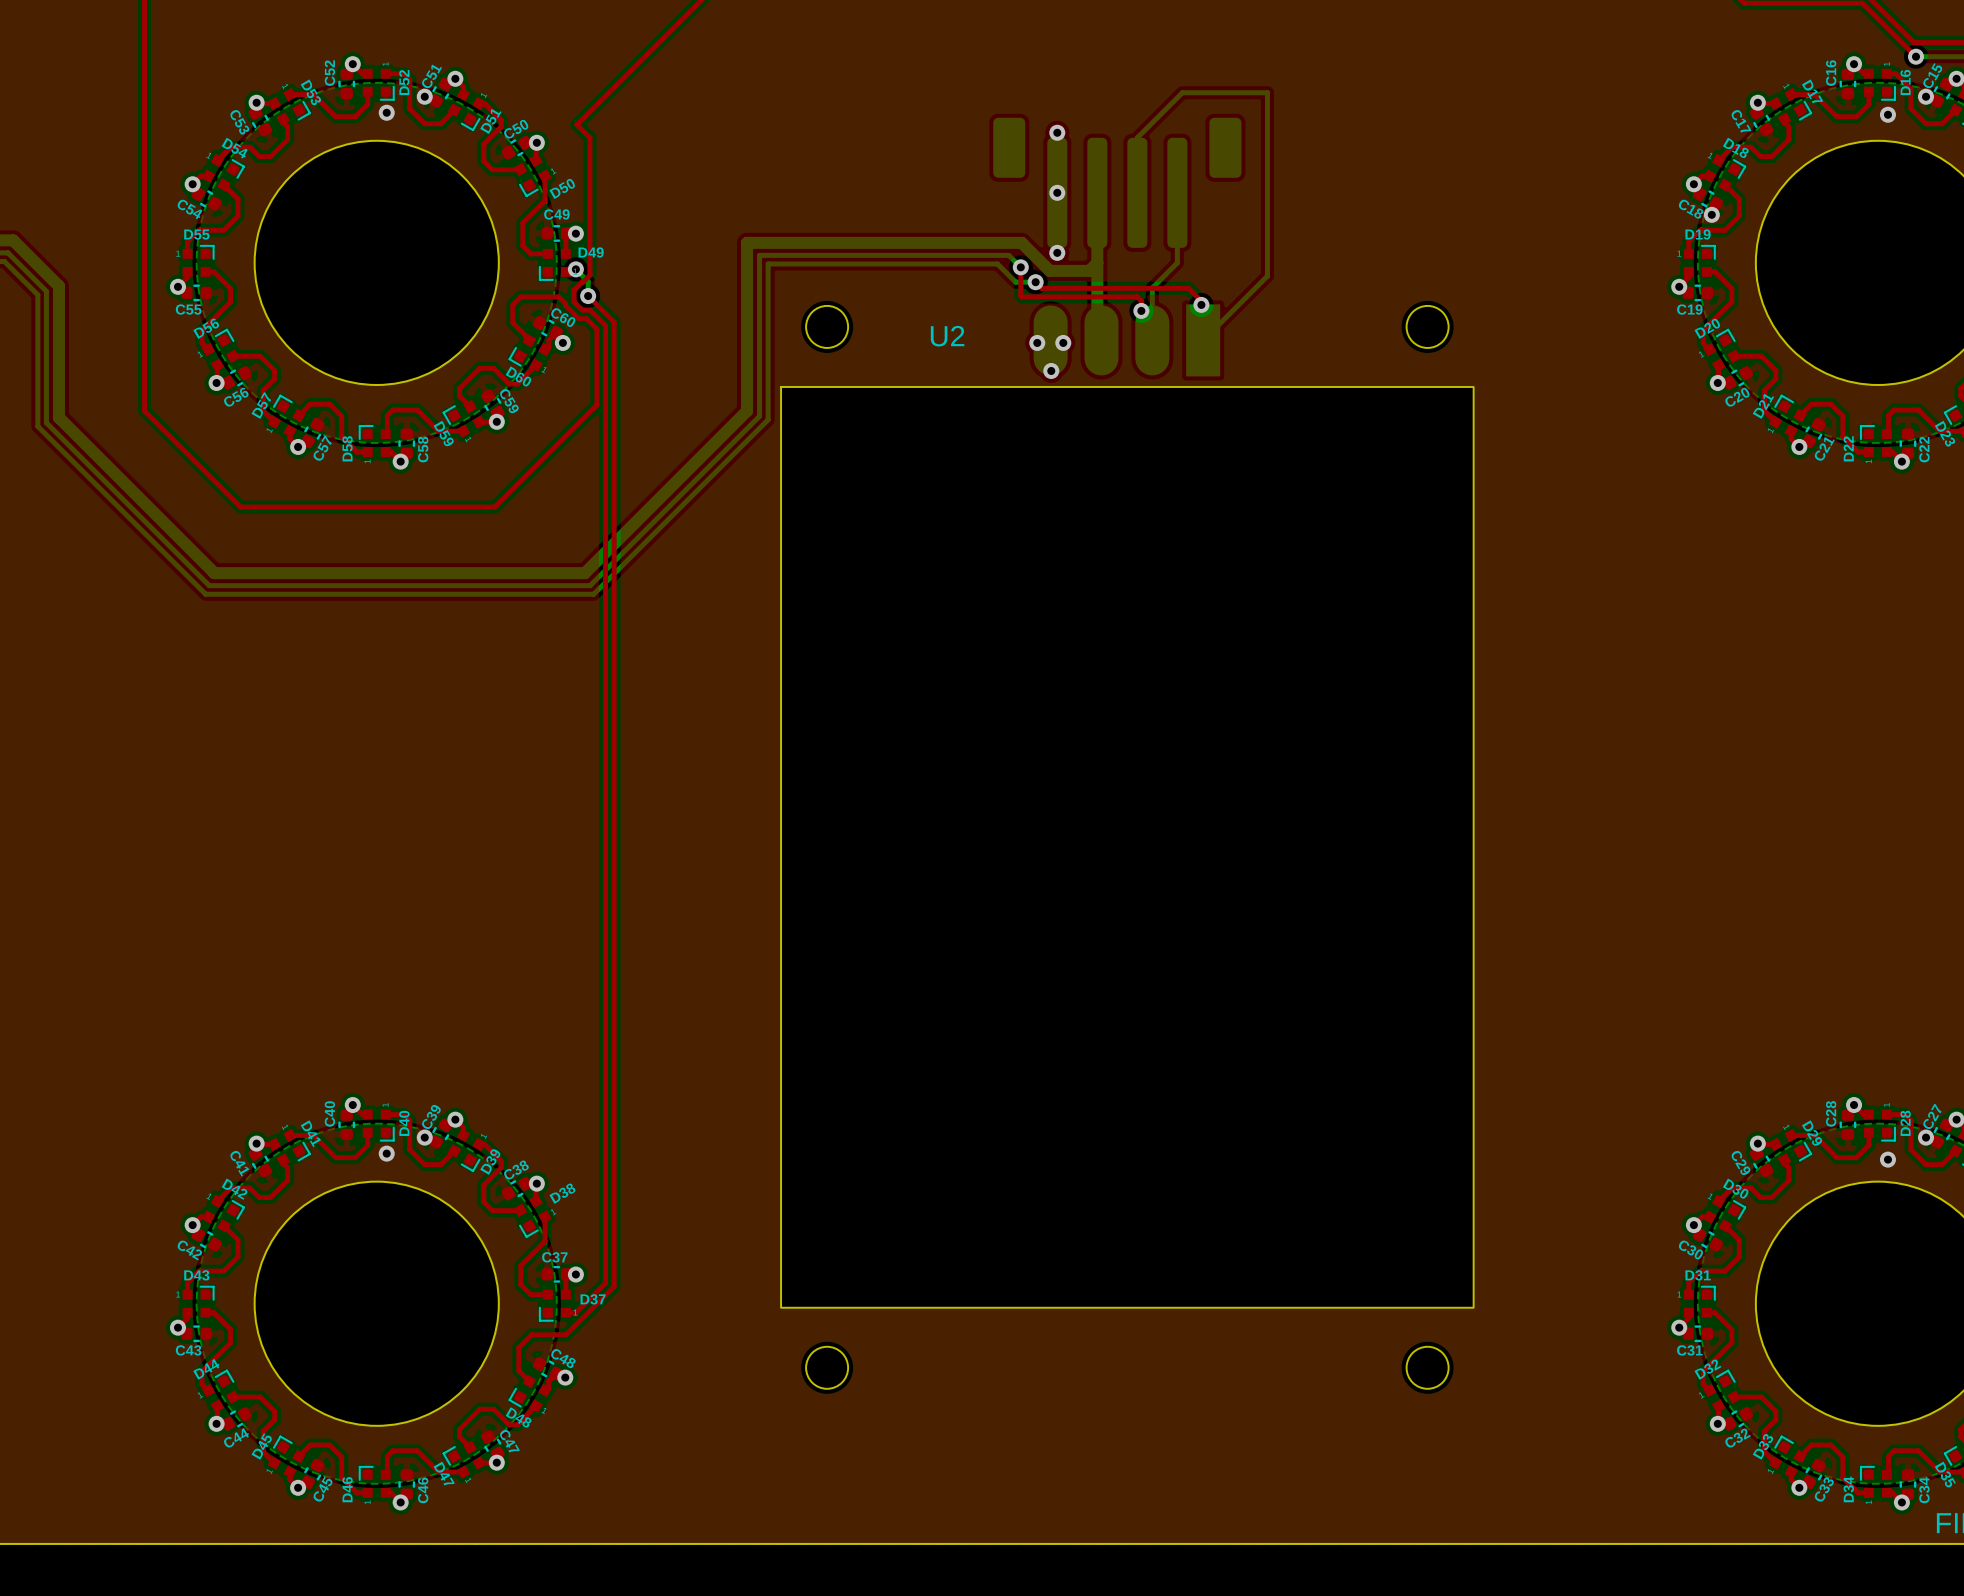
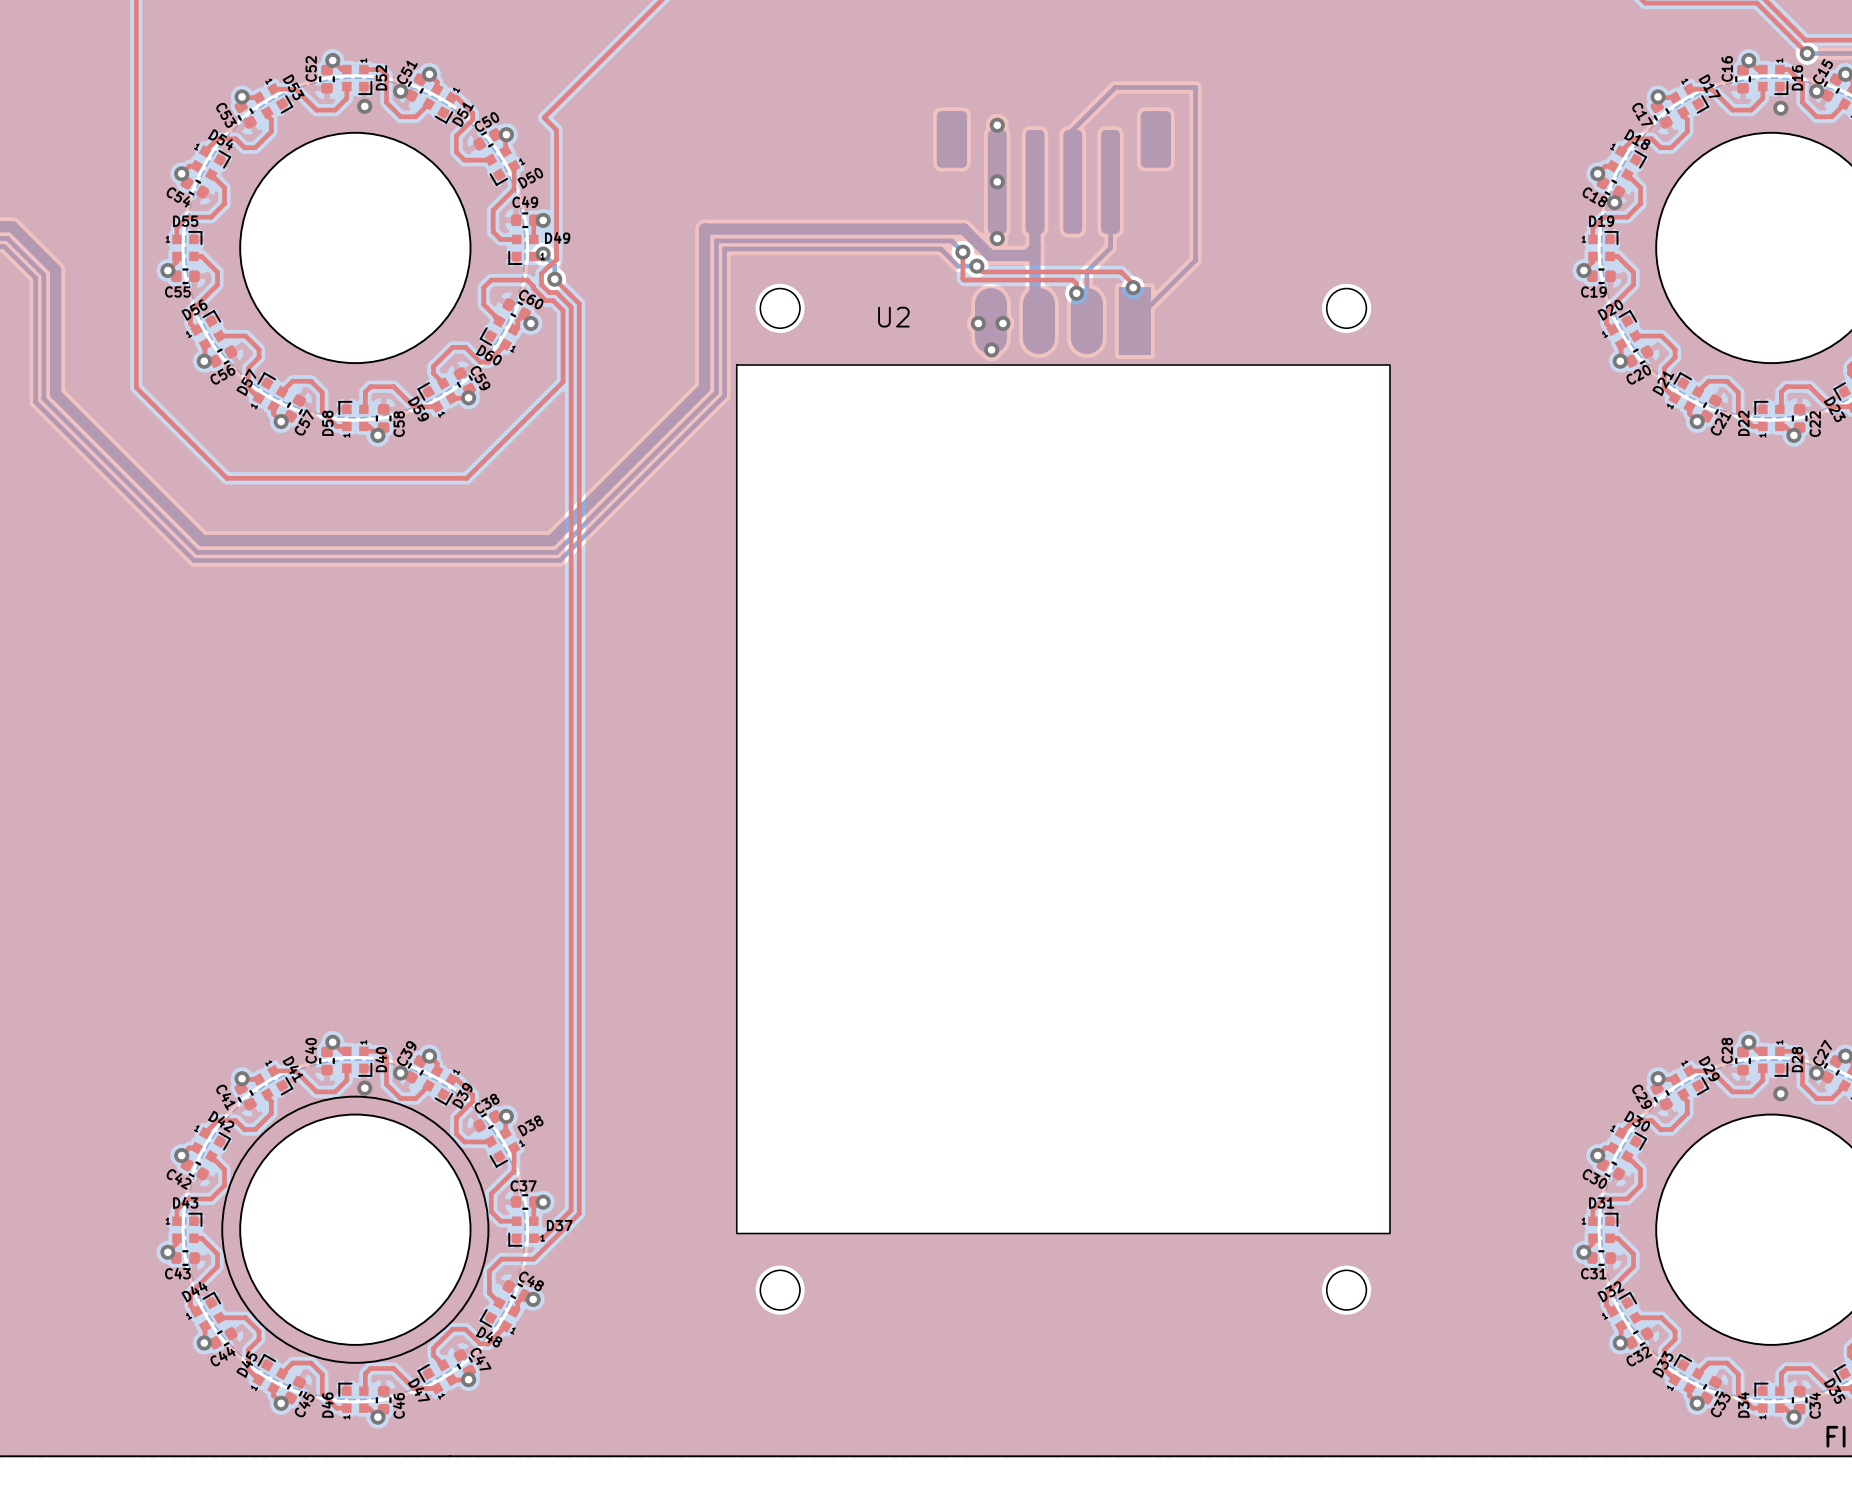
drawing: none -> [221, 1095, 490, 1364]

